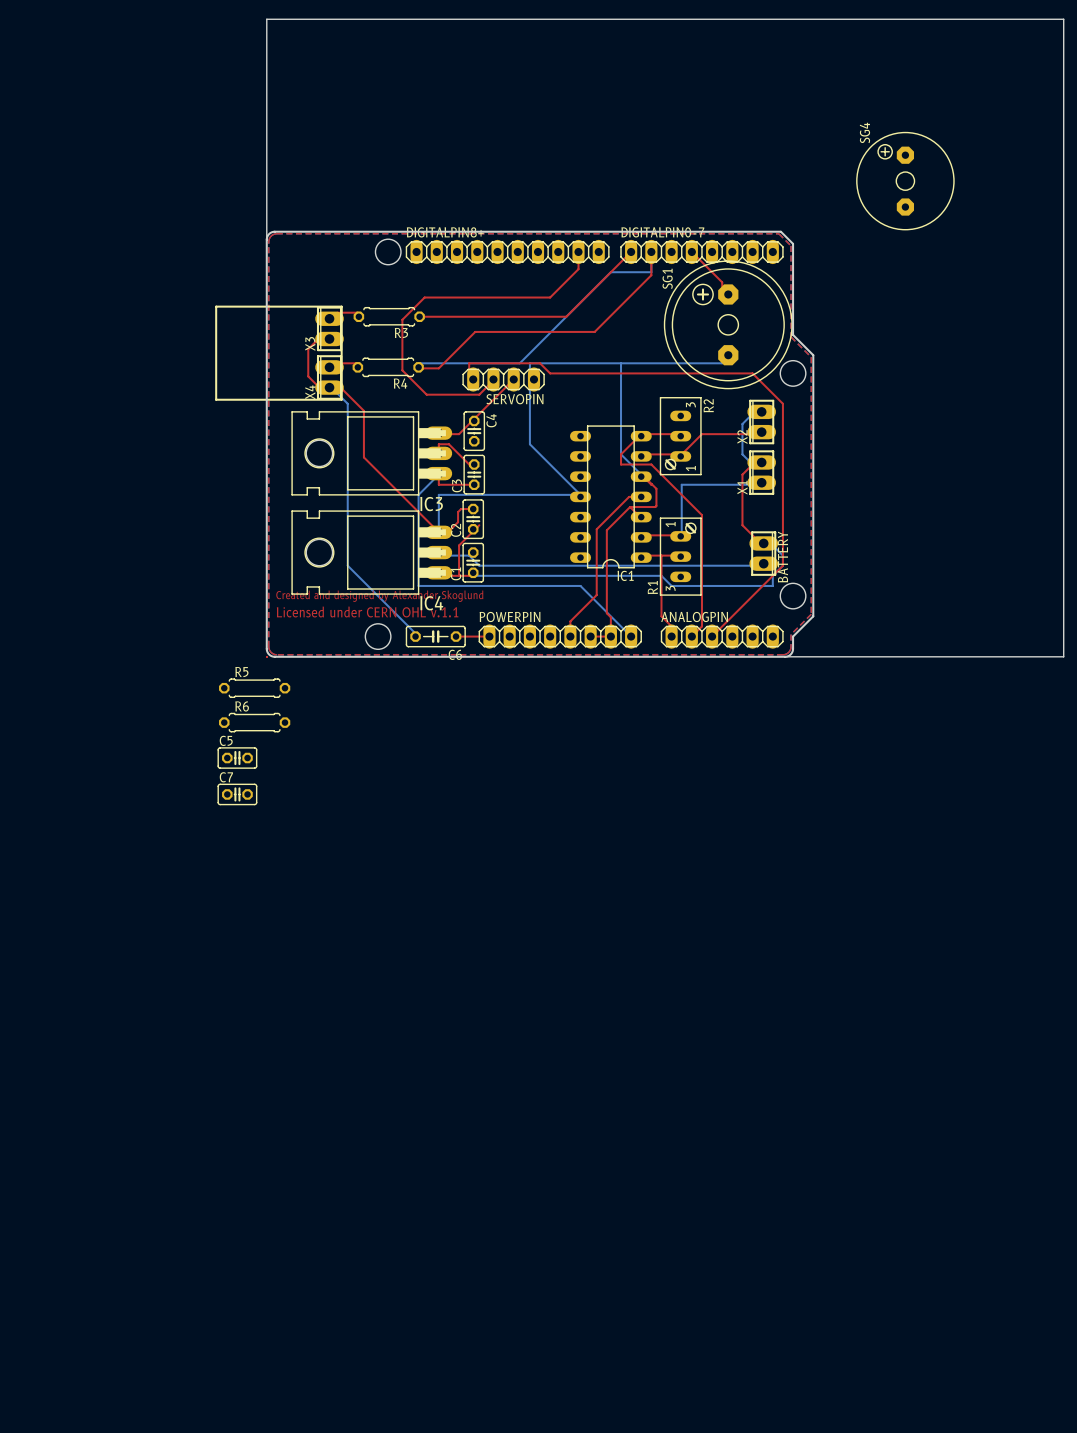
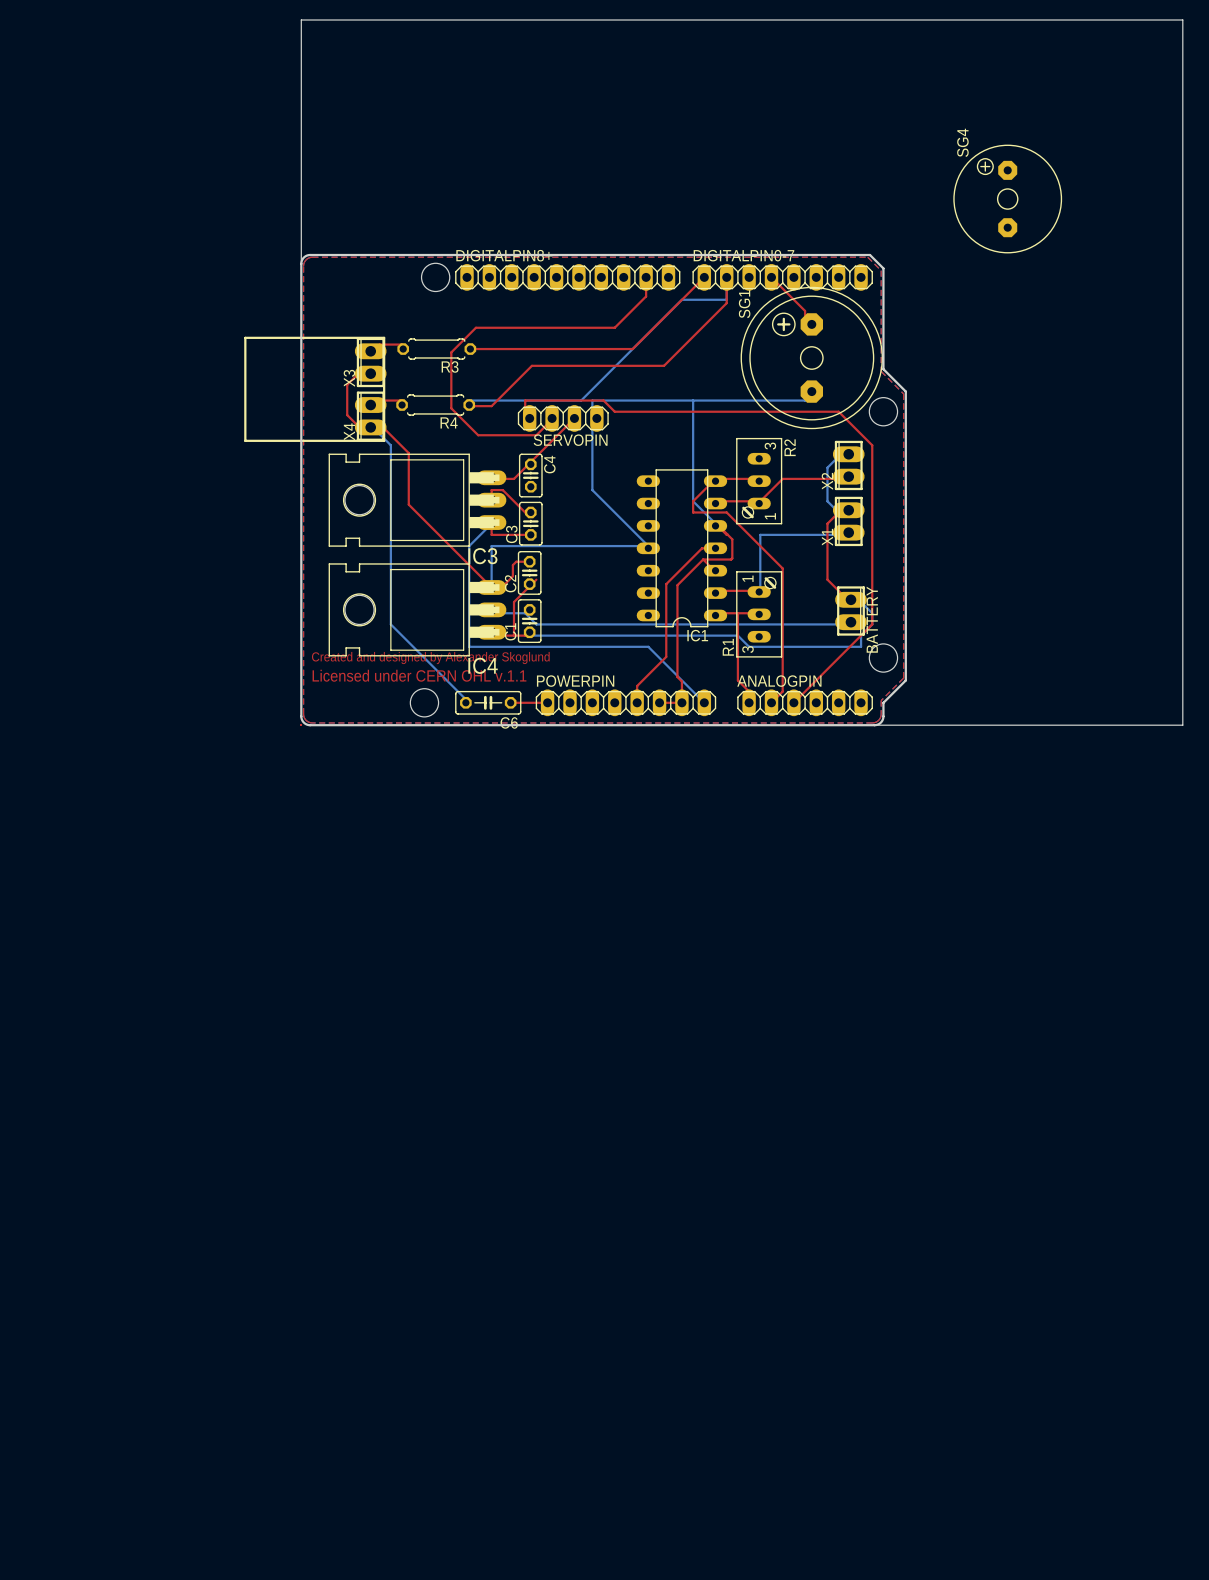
R5: (254, 688) -> none
R6: (254, 722) -> none
C5: (237, 758) -> none
C7: (237, 794) -> none

